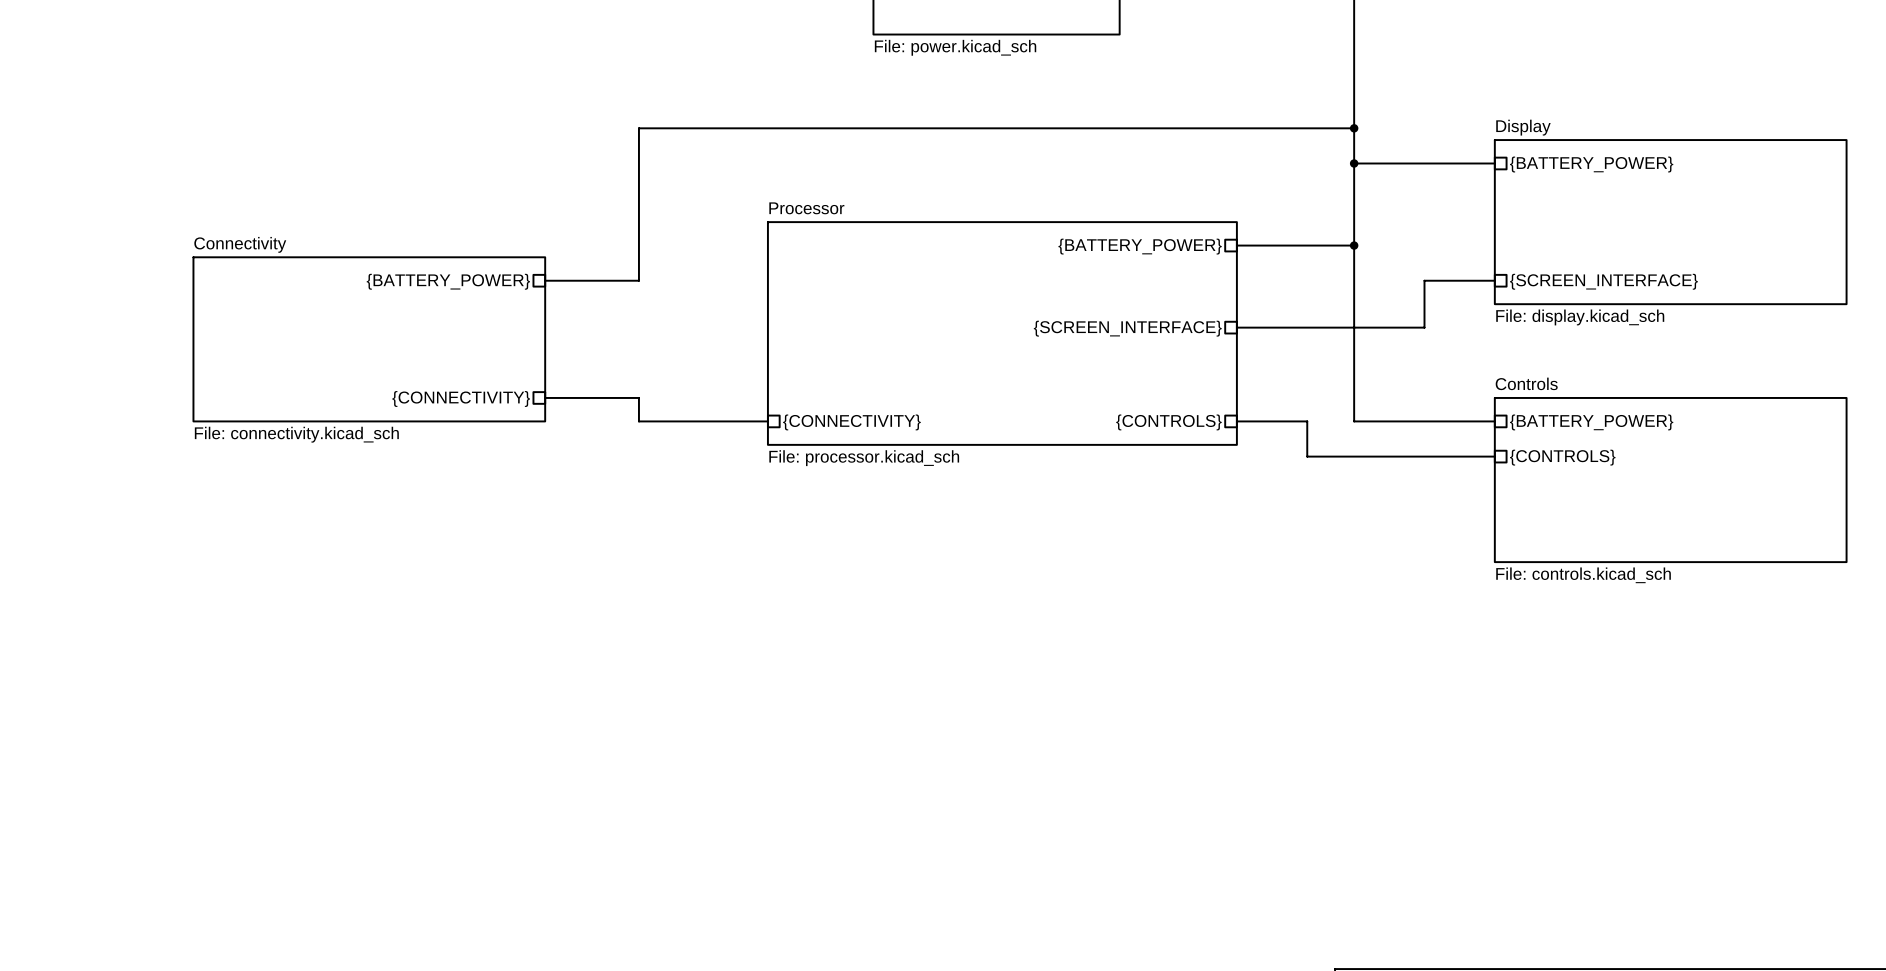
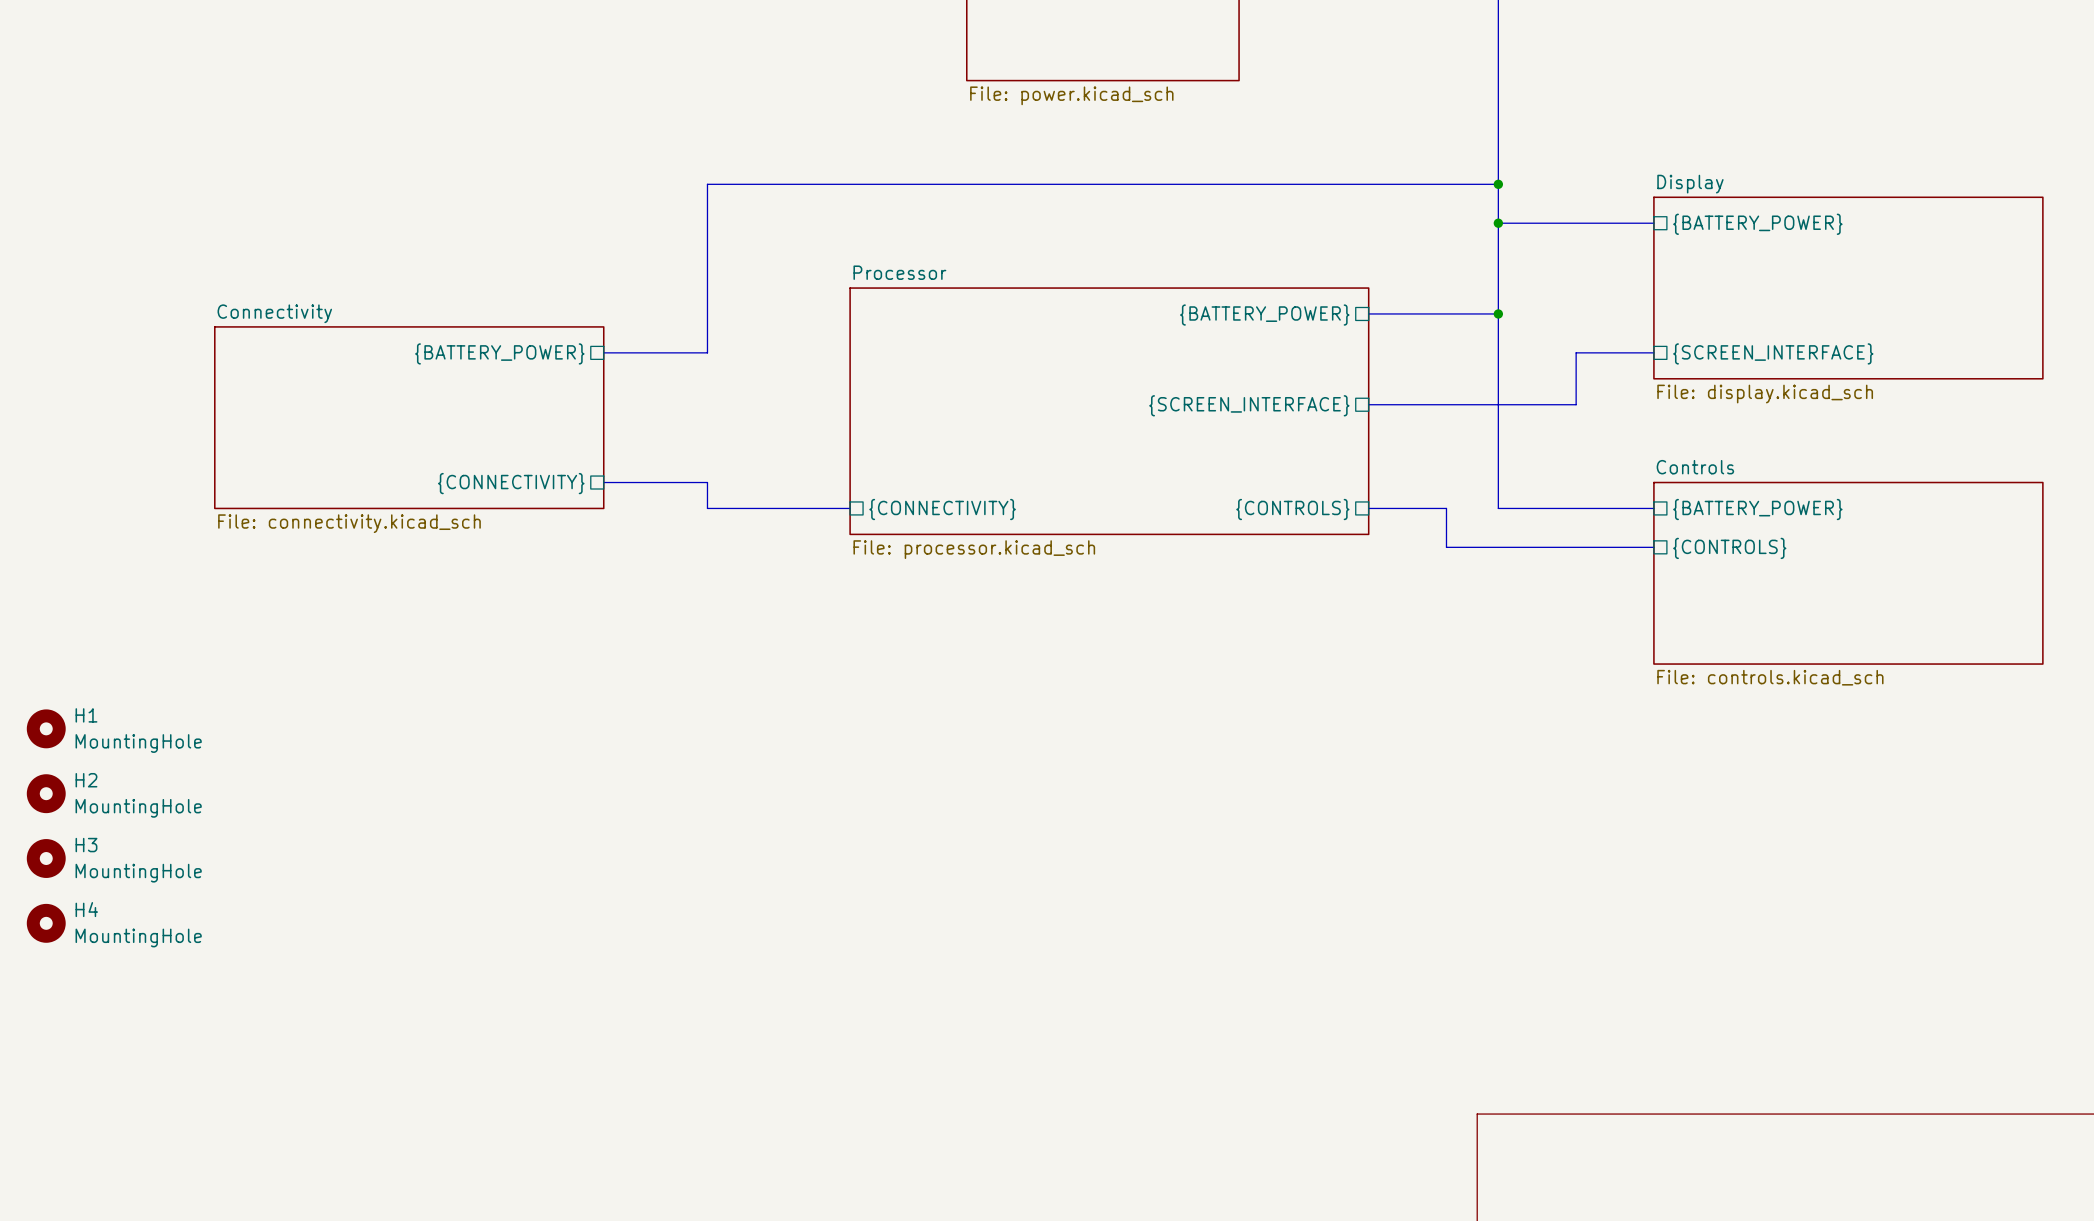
H1: none -> MountingHole (46, 728)
H2: none -> MountingHole (46, 793)
H3: none -> MountingHole (46, 858)
H4: none -> MountingHole (46, 923)

